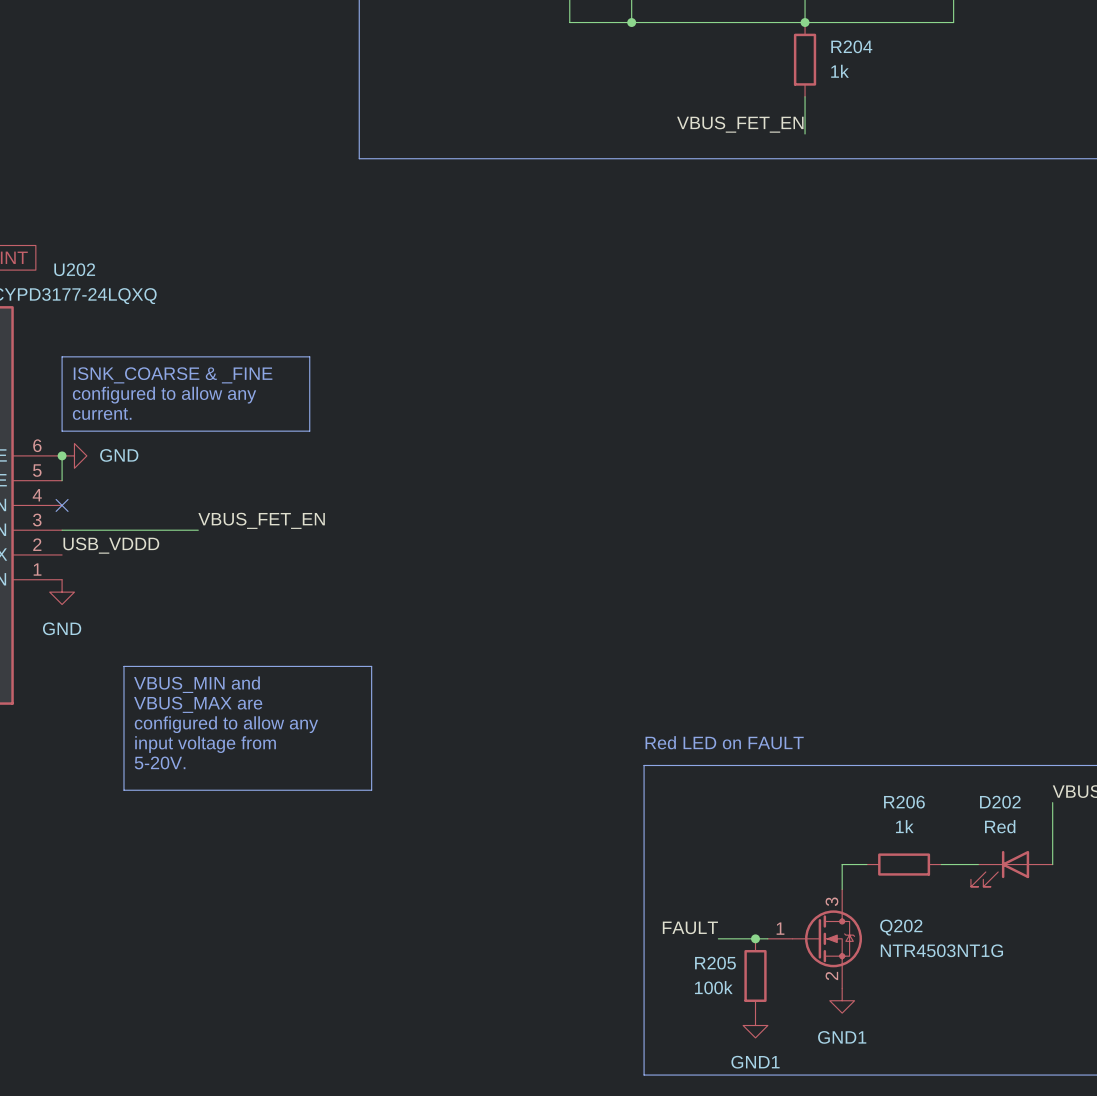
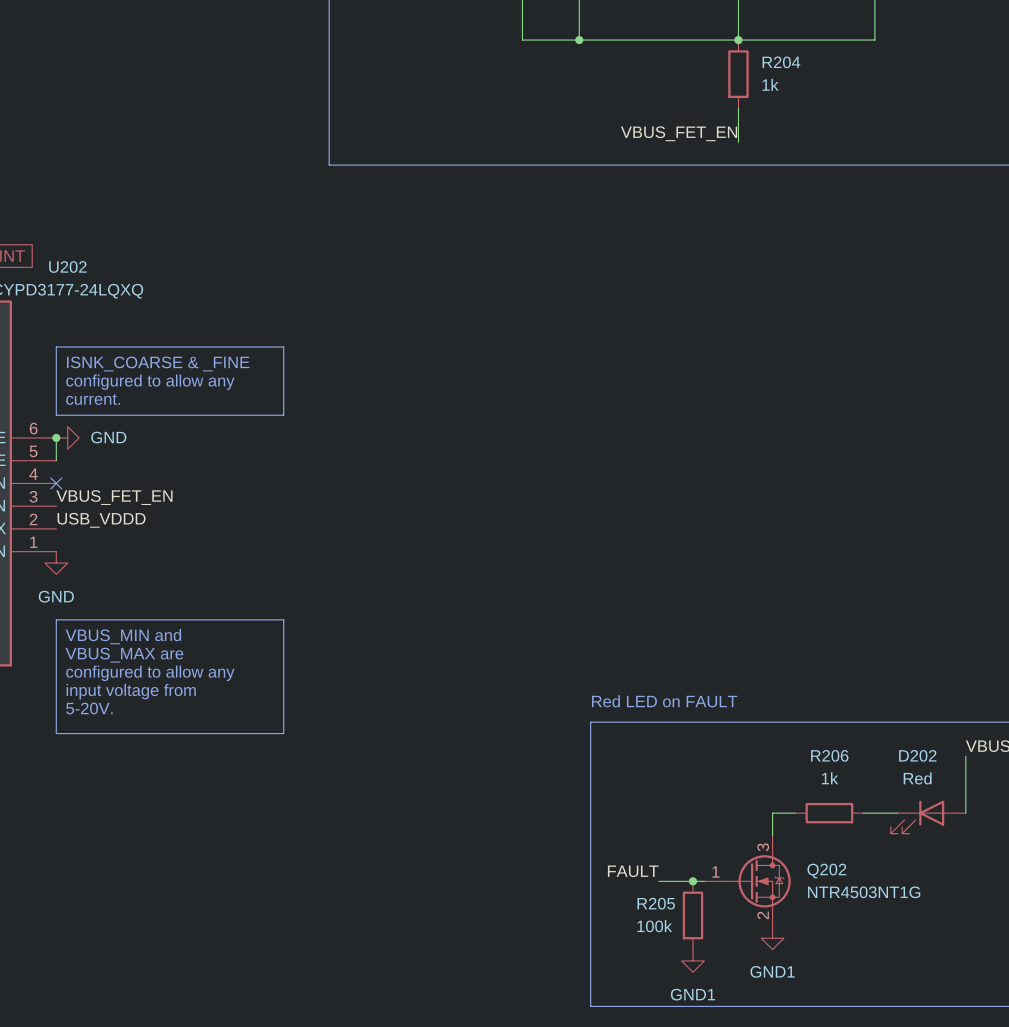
label position: VBUS_FET_EN (261, 520) -> VBUS_FET_EN (114, 497)
wire: (62, 530) (198, 530) -> none
line: (123, 666) (371, 666) (371, 790) (123, 790) (123, 666) -> (56, 619) (56, 733) (283, 733) (283, 619) (56, 619)
text position: VBUS_MIN and (197, 684) -> VBUS_MIN and (123, 636)
text position: VBUS_MAX are (198, 704) -> VBUS_MAX are (124, 655)
text position: configured to allow any (226, 724) -> configured to allow any (150, 673)
text position: input voltage from (205, 744) -> input voltage from (131, 691)
text position: 5-20V. (160, 762) -> 5-20V. (89, 708)

